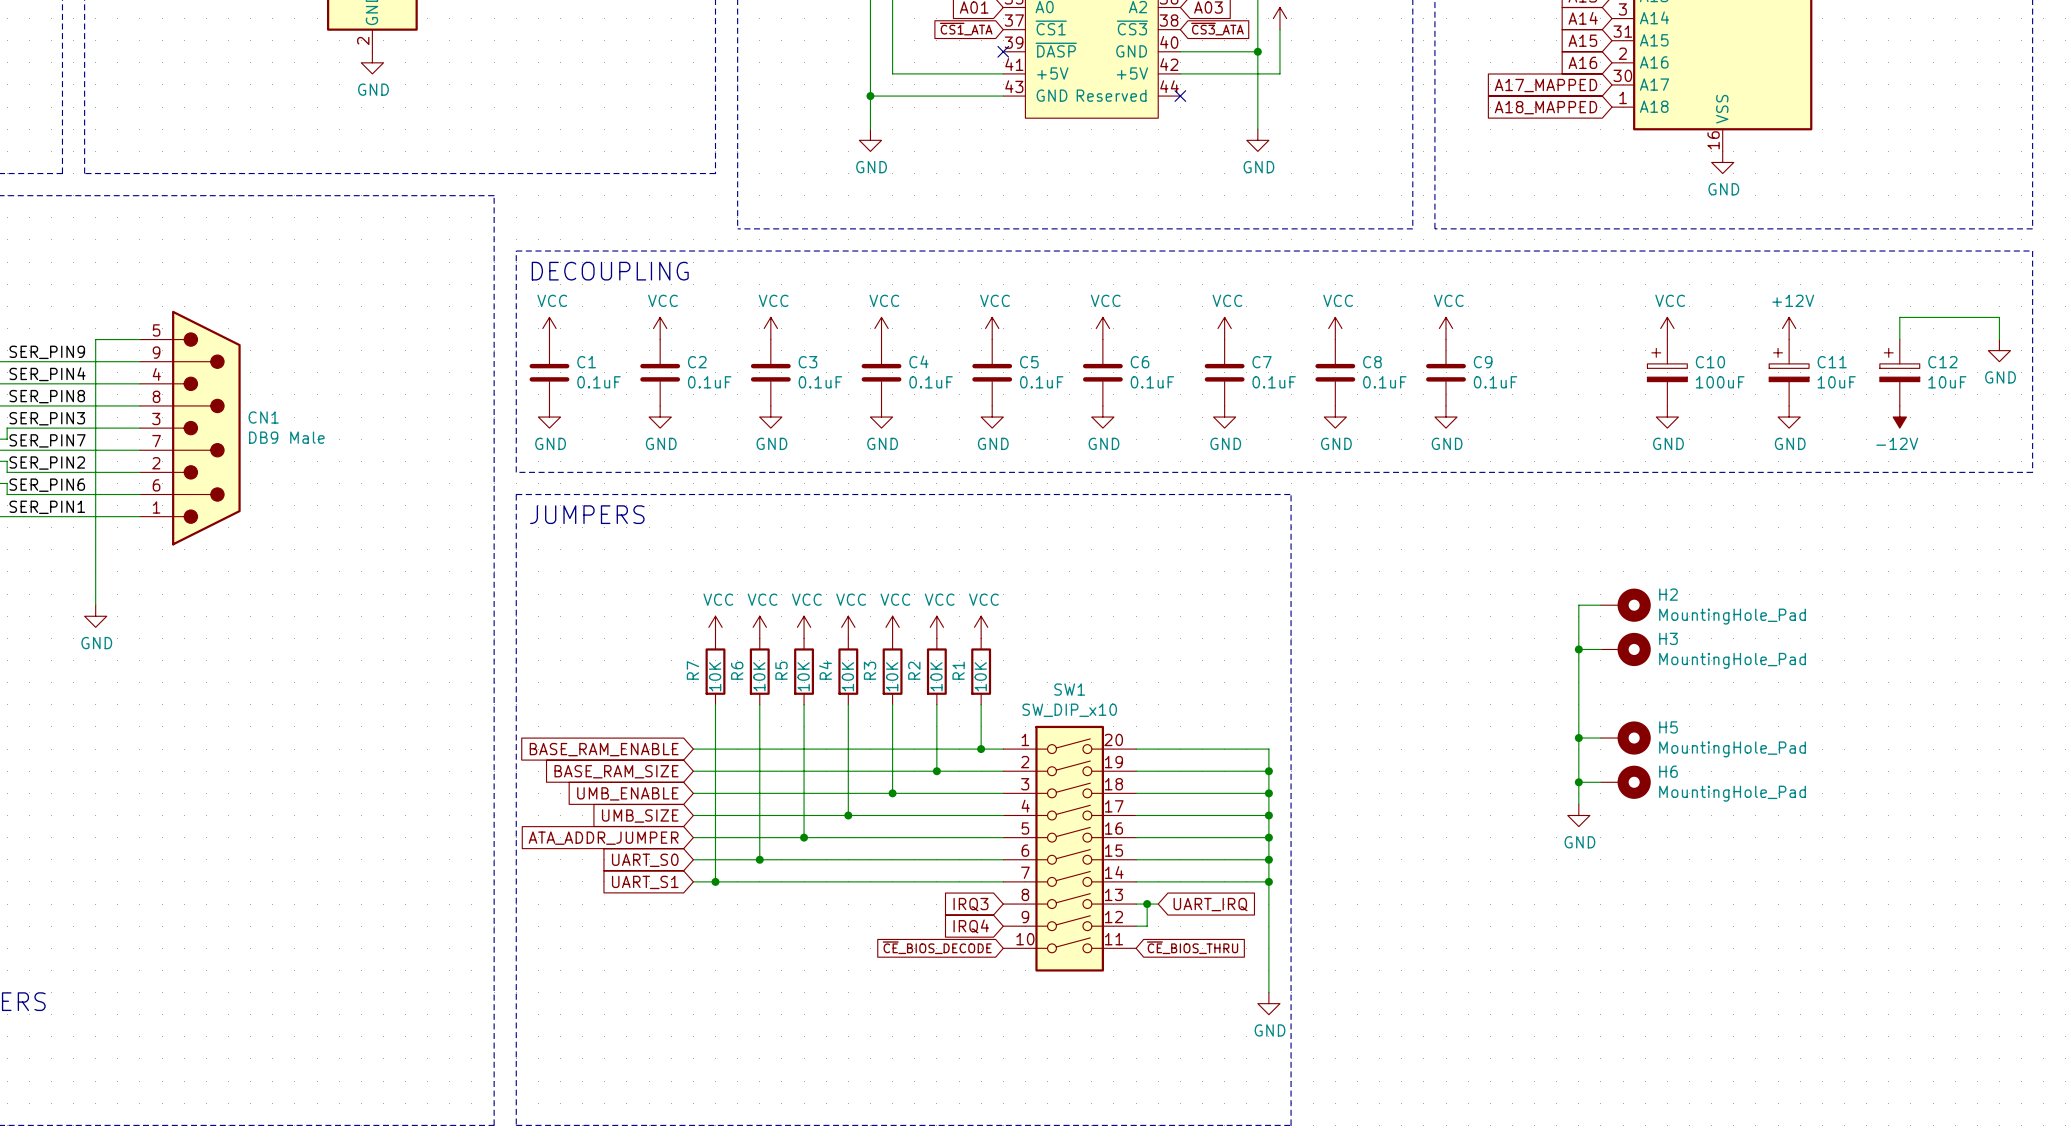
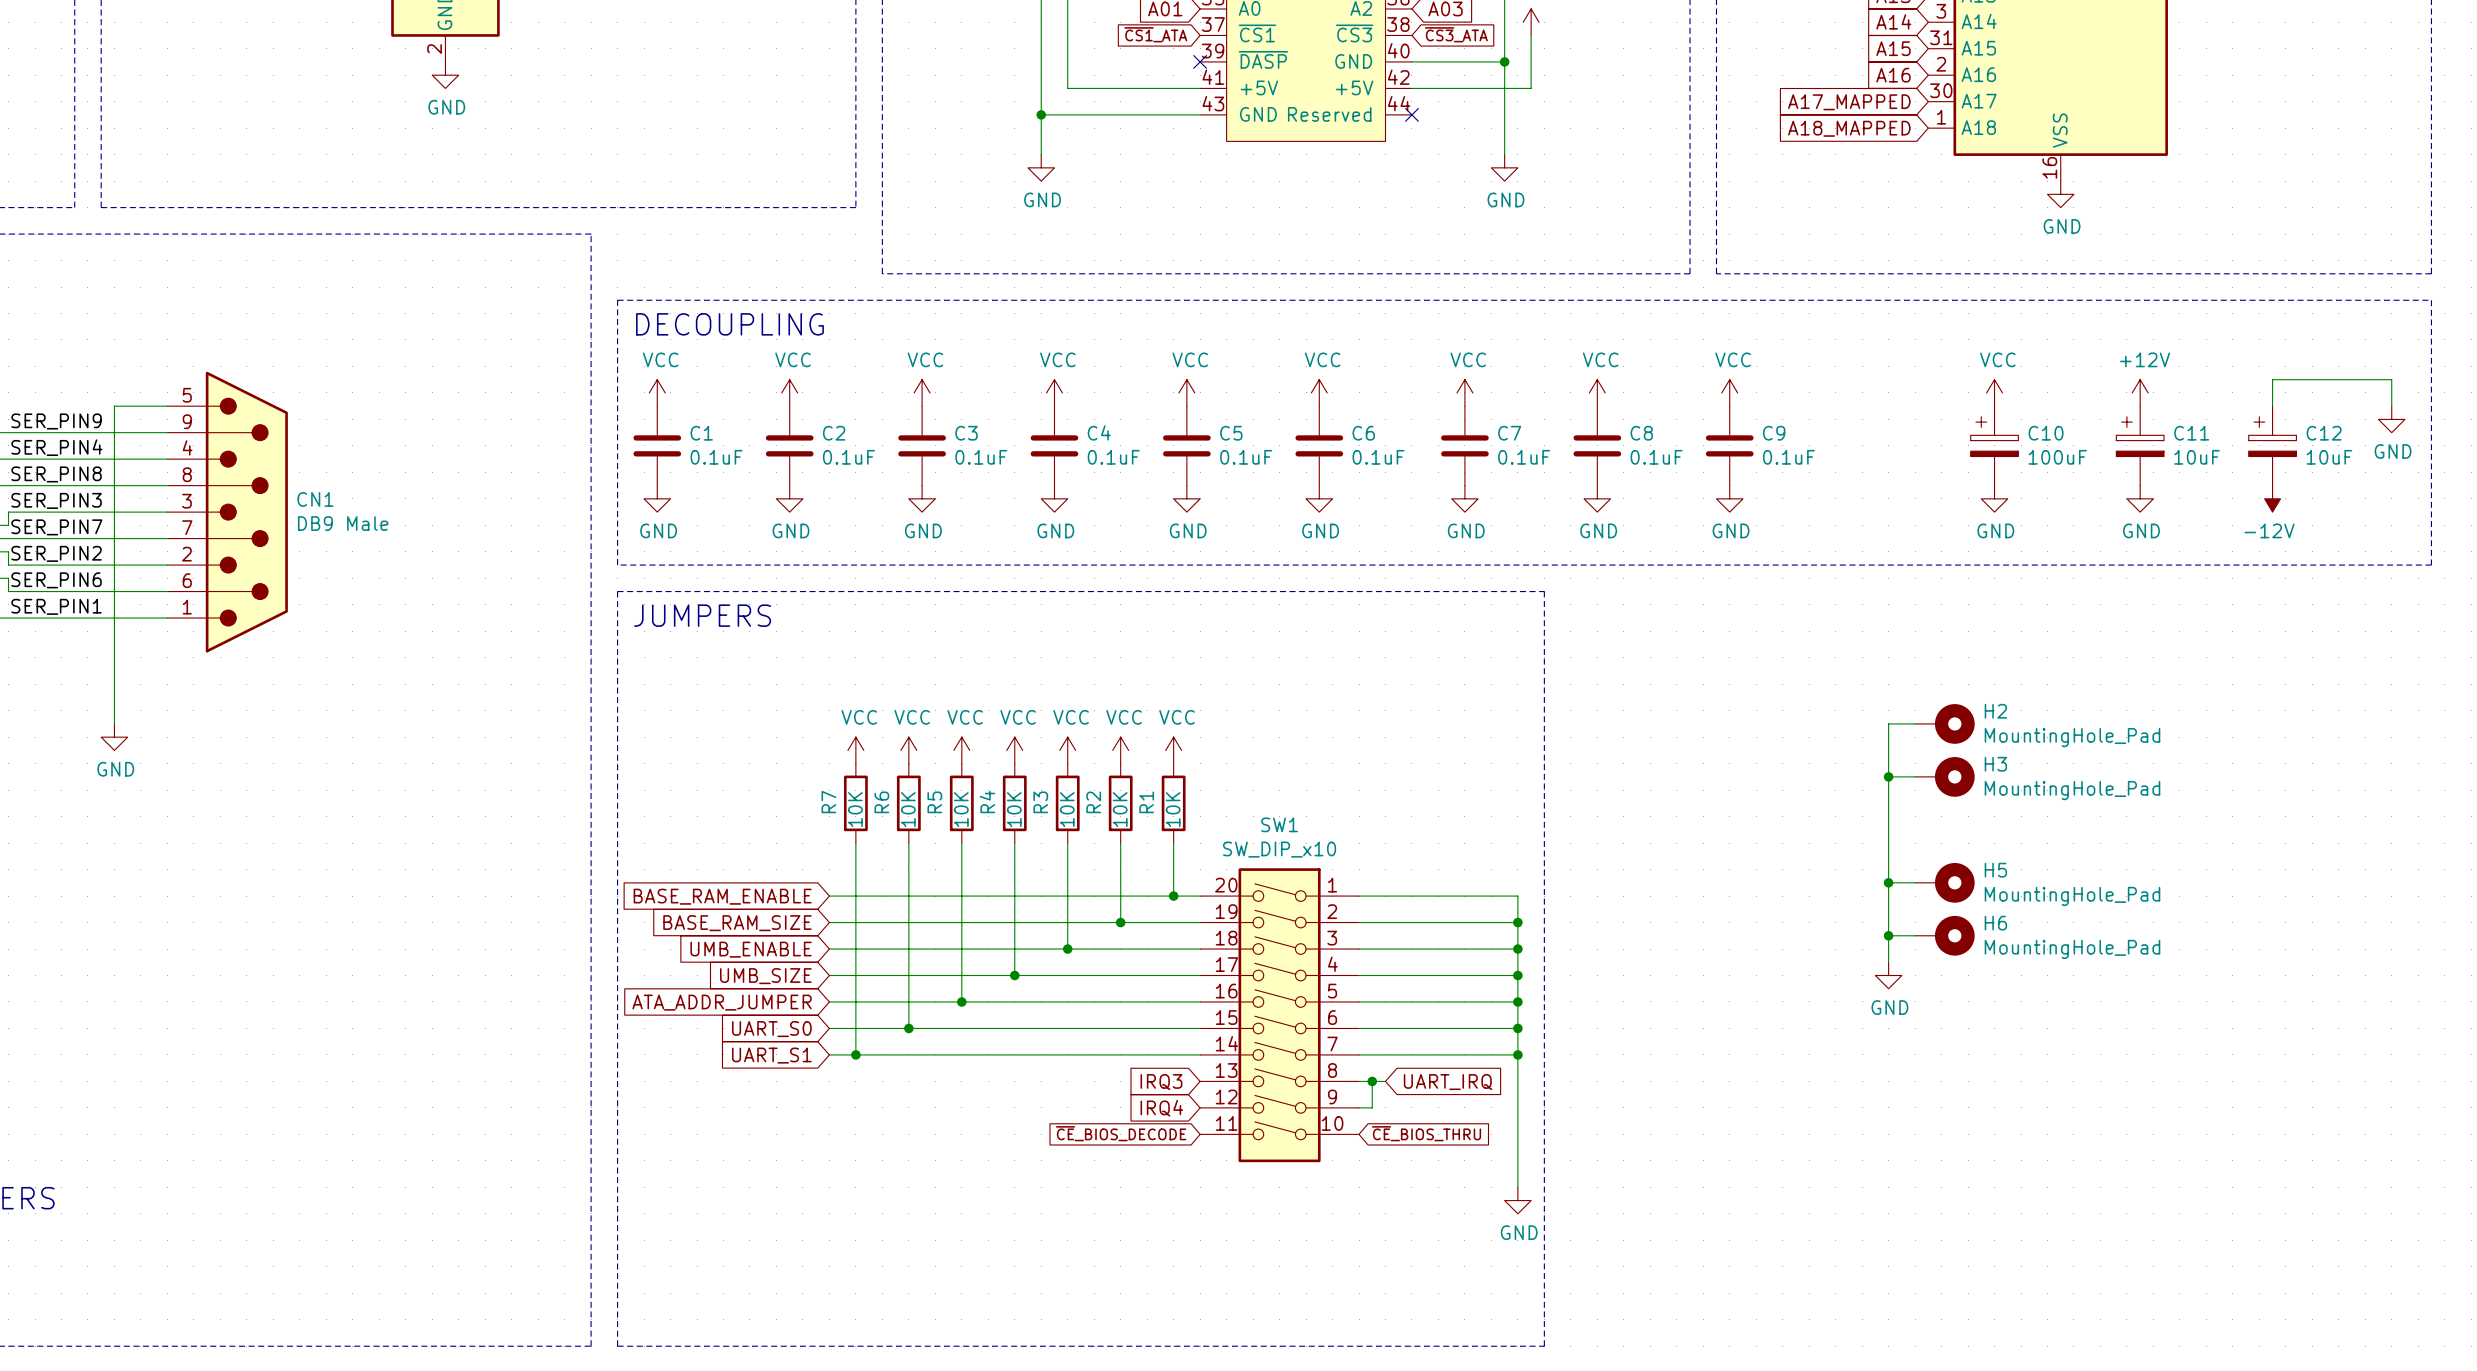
SW1 flip: as is (1069, 848) -> left-right (1279, 1015)

